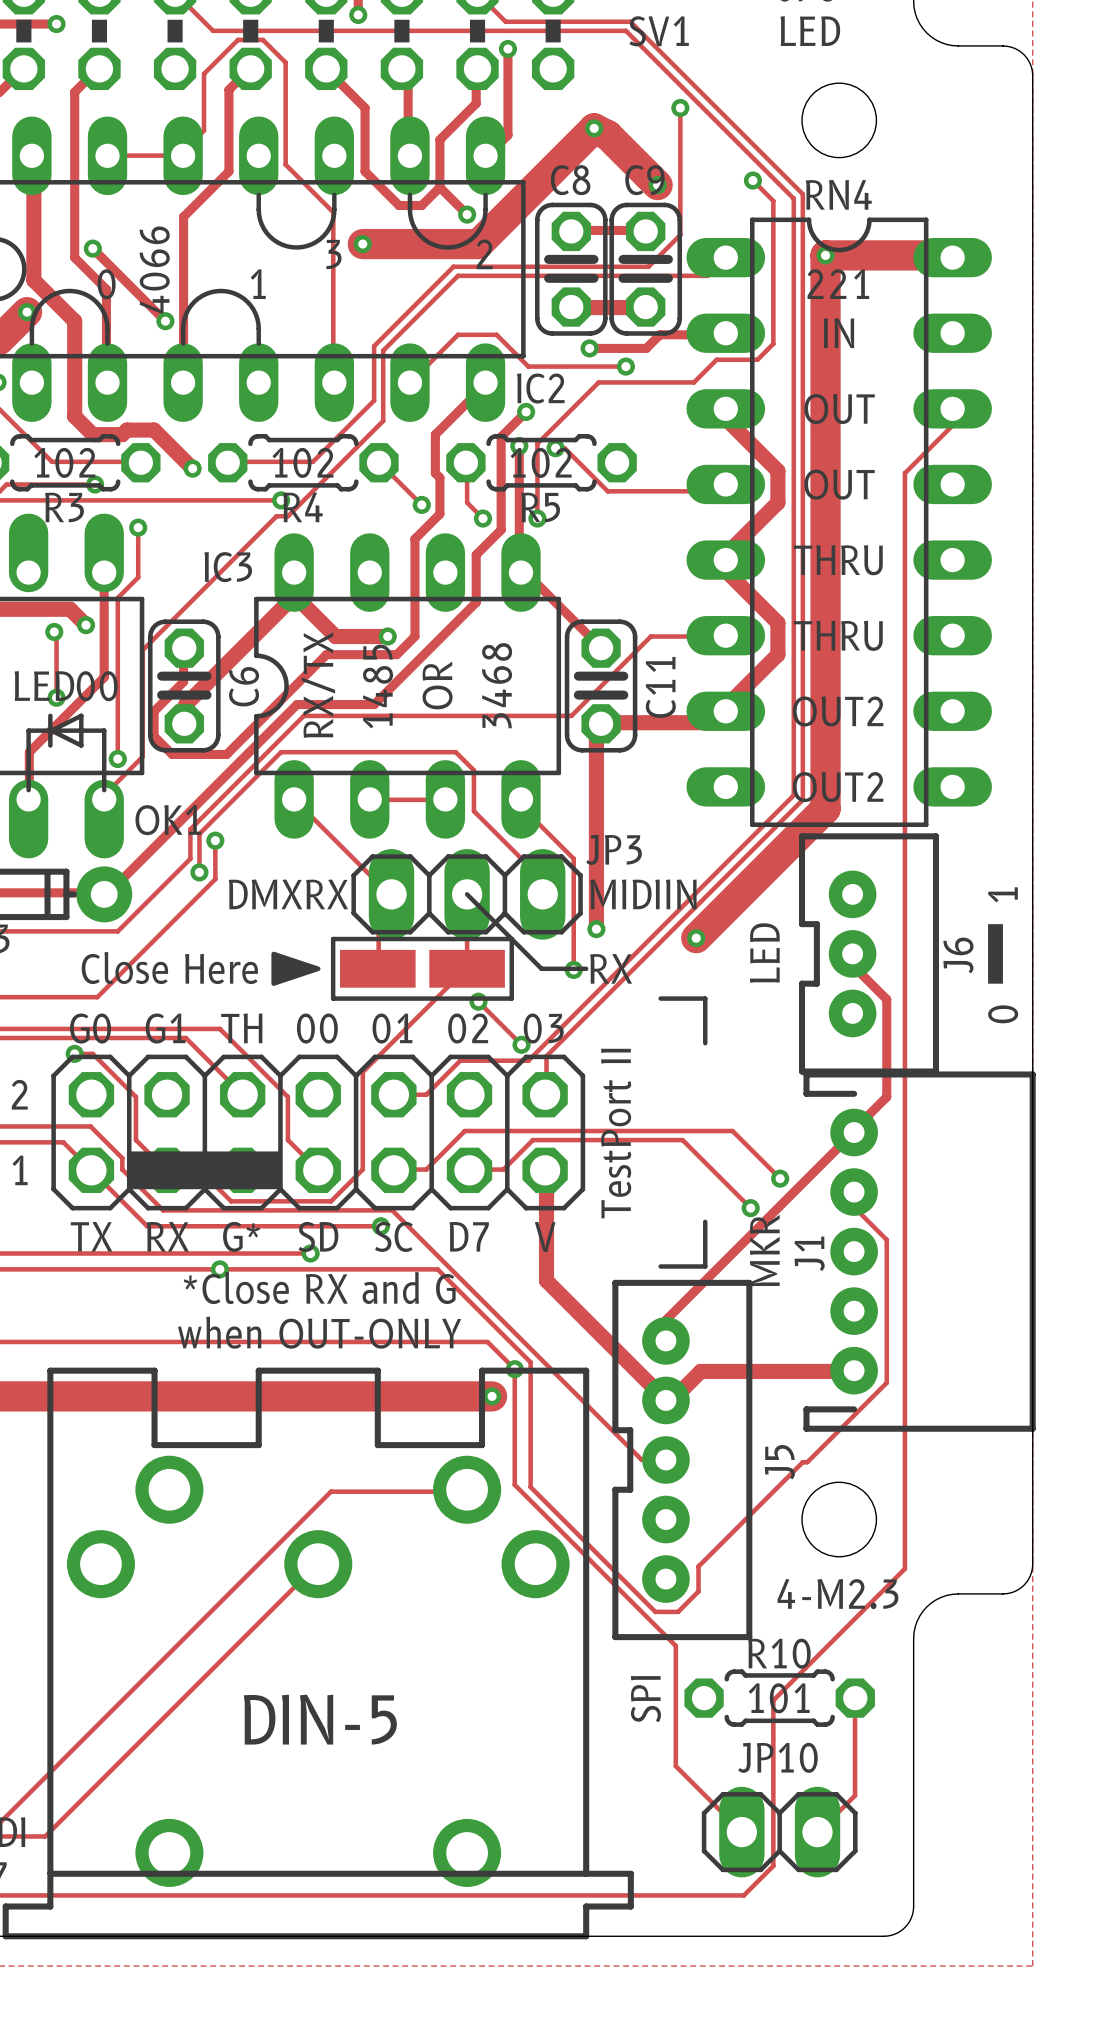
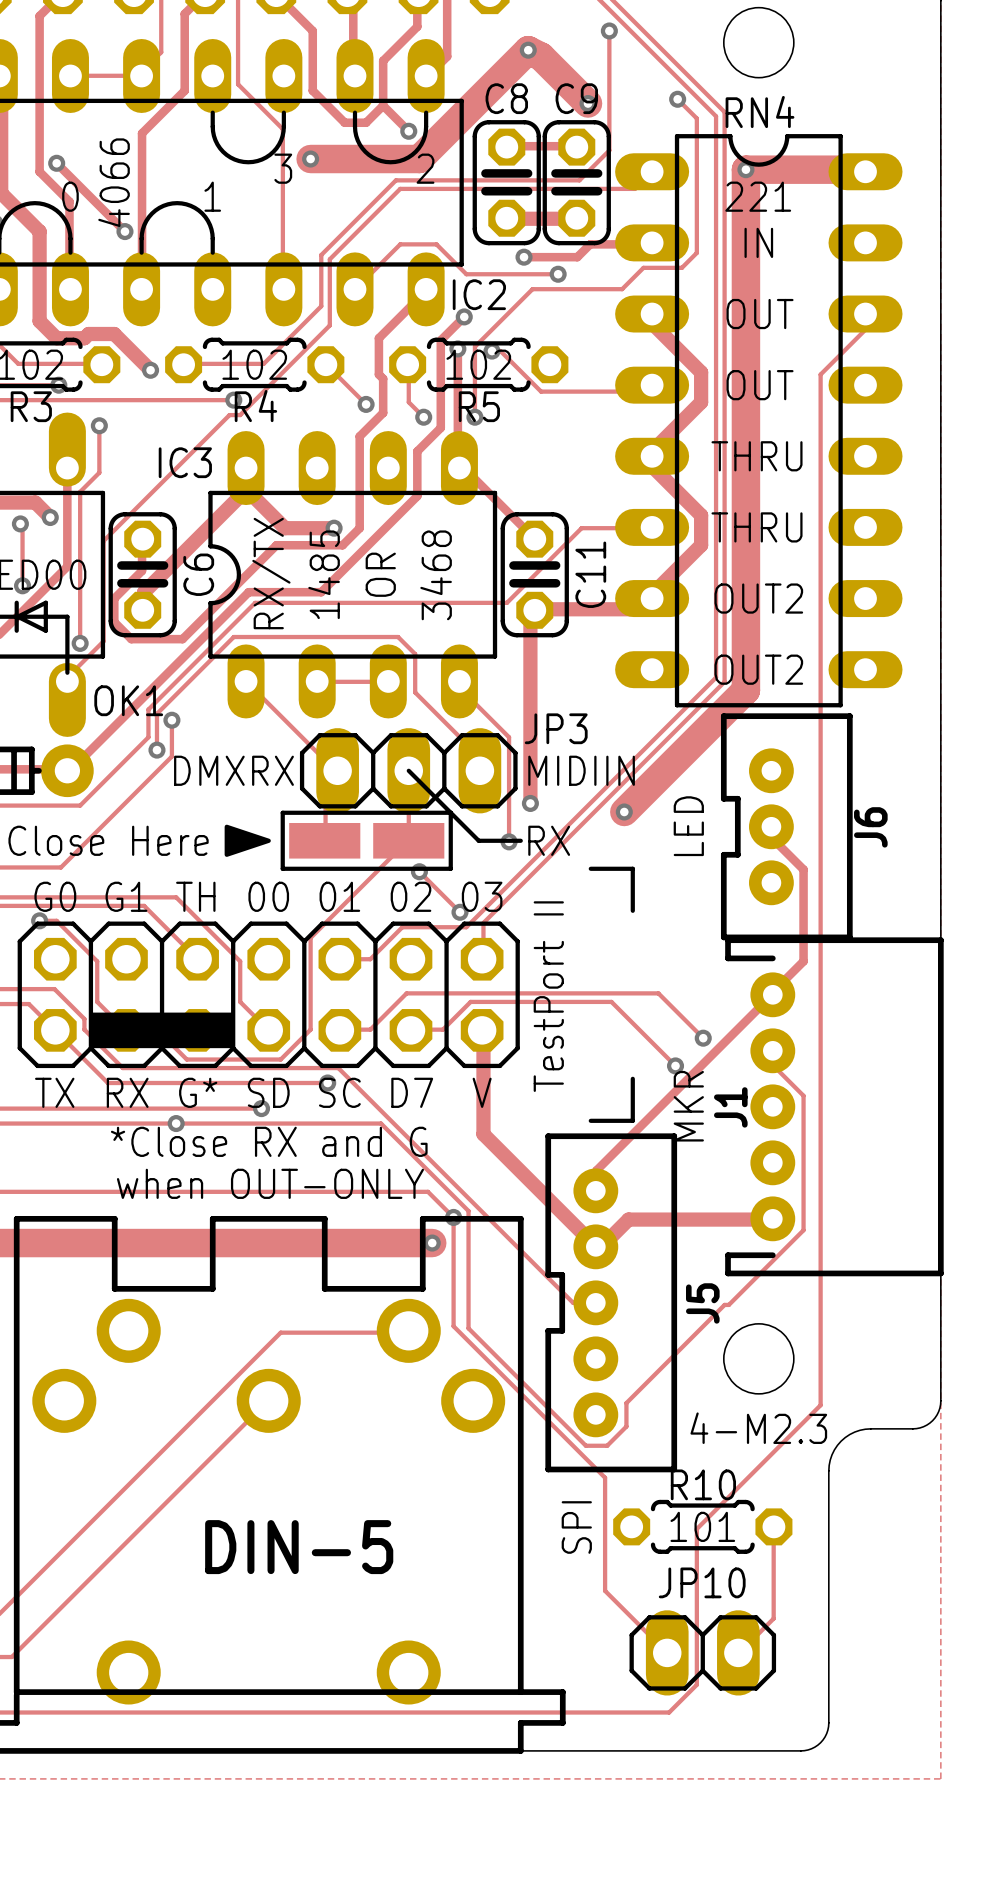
text: 1 (1002, 894) -> none
drawing: [988, 924, 1003, 984] -> none
text: 0 (1003, 1014) -> none

